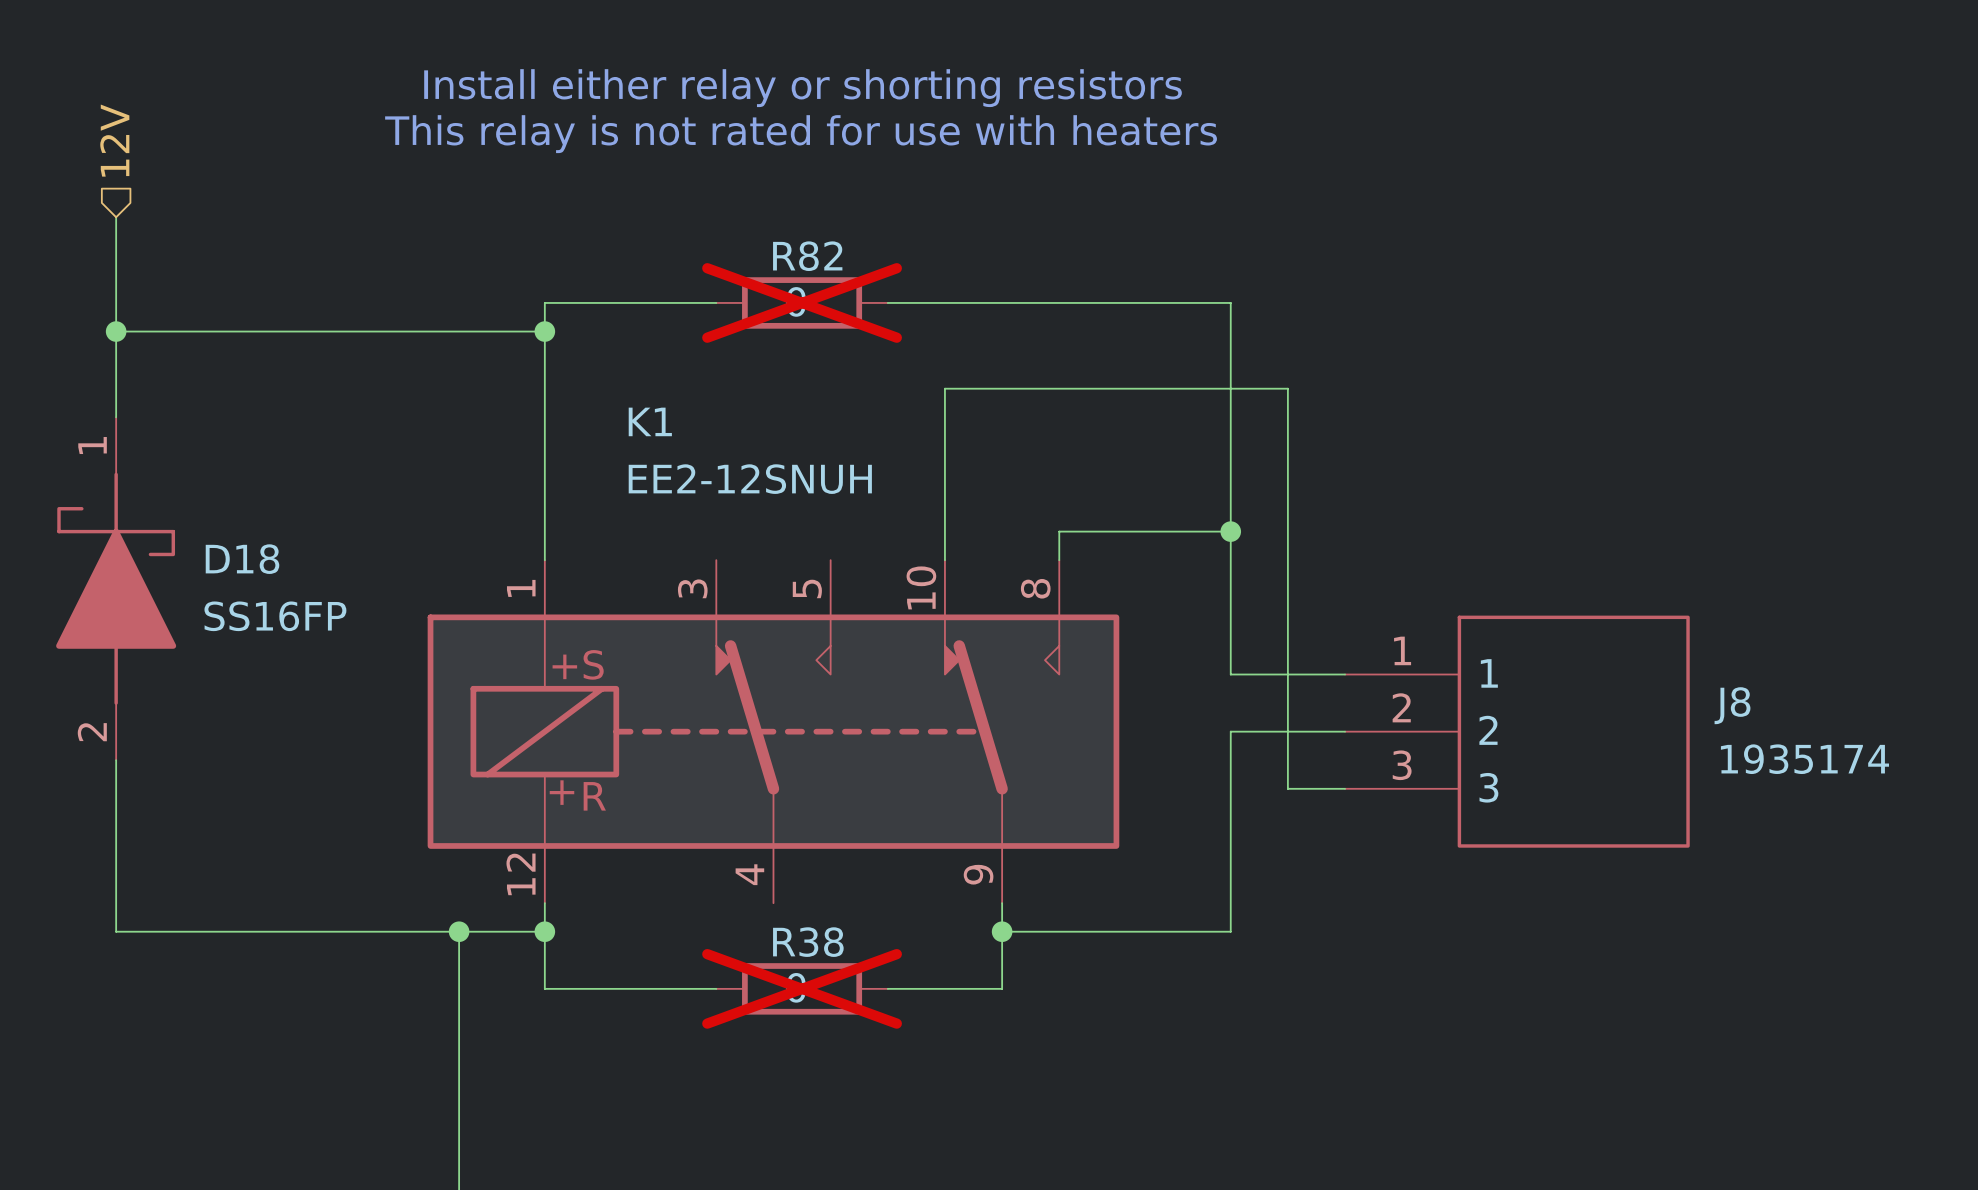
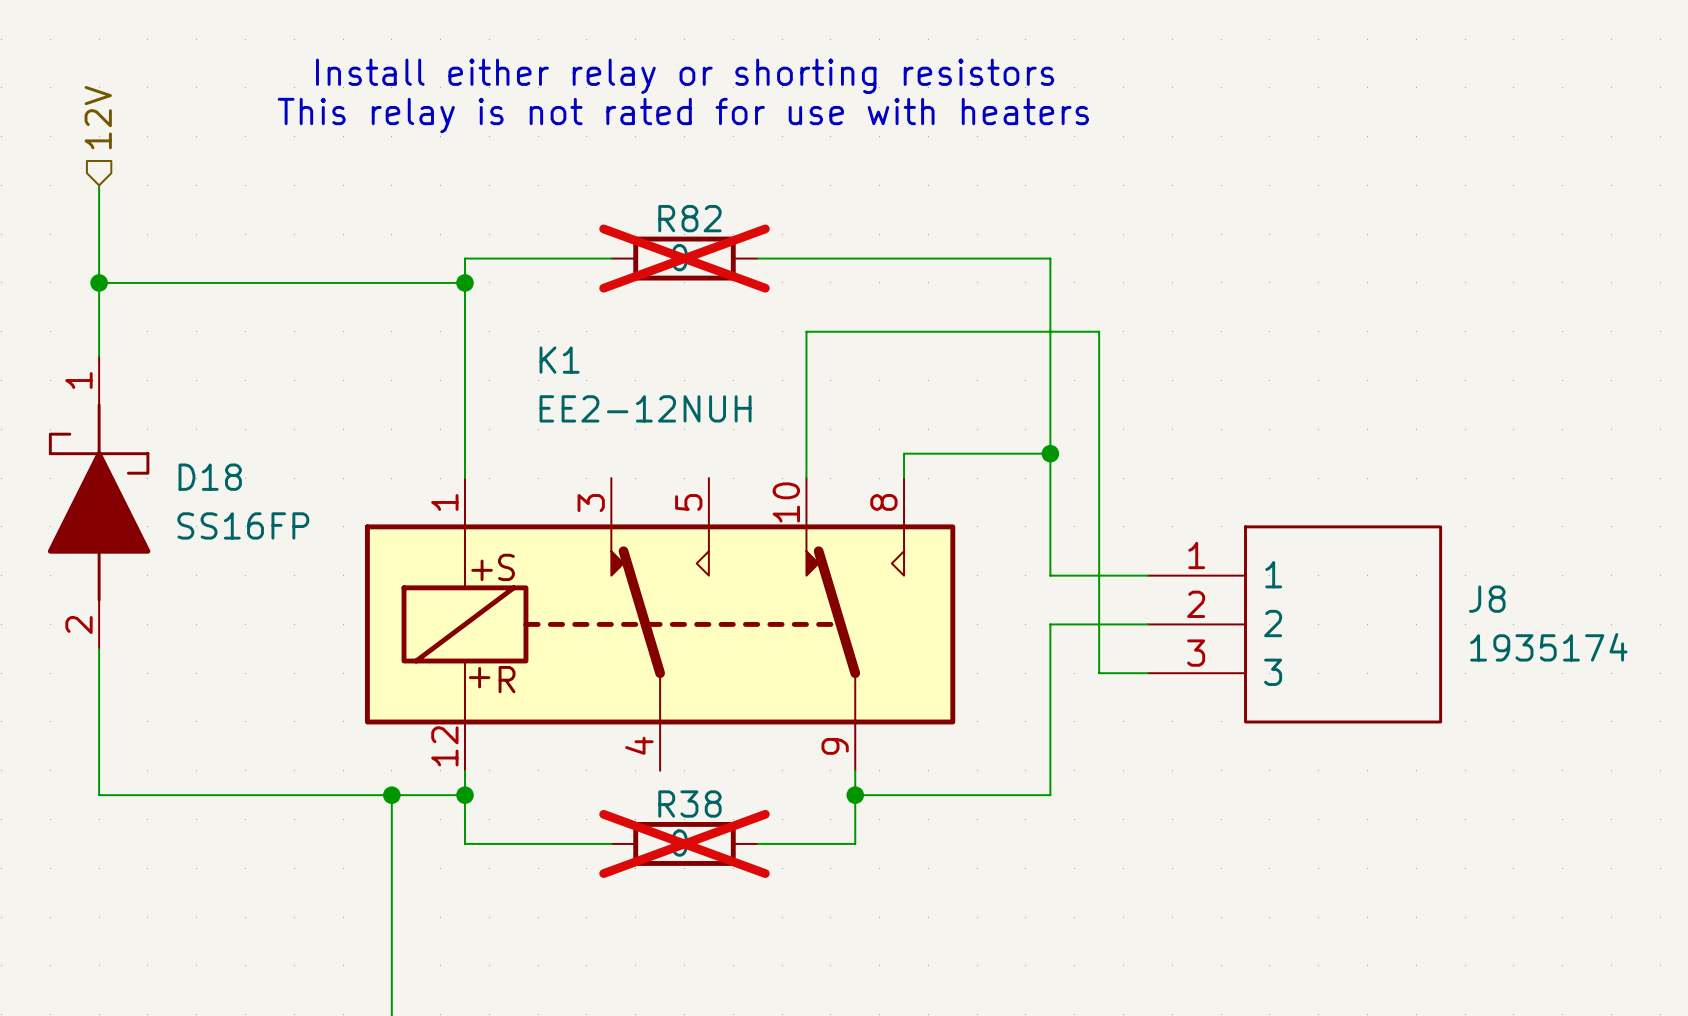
K1 value: EE2-12SNUH (750, 479) -> EE2-12NUH (645, 408)

